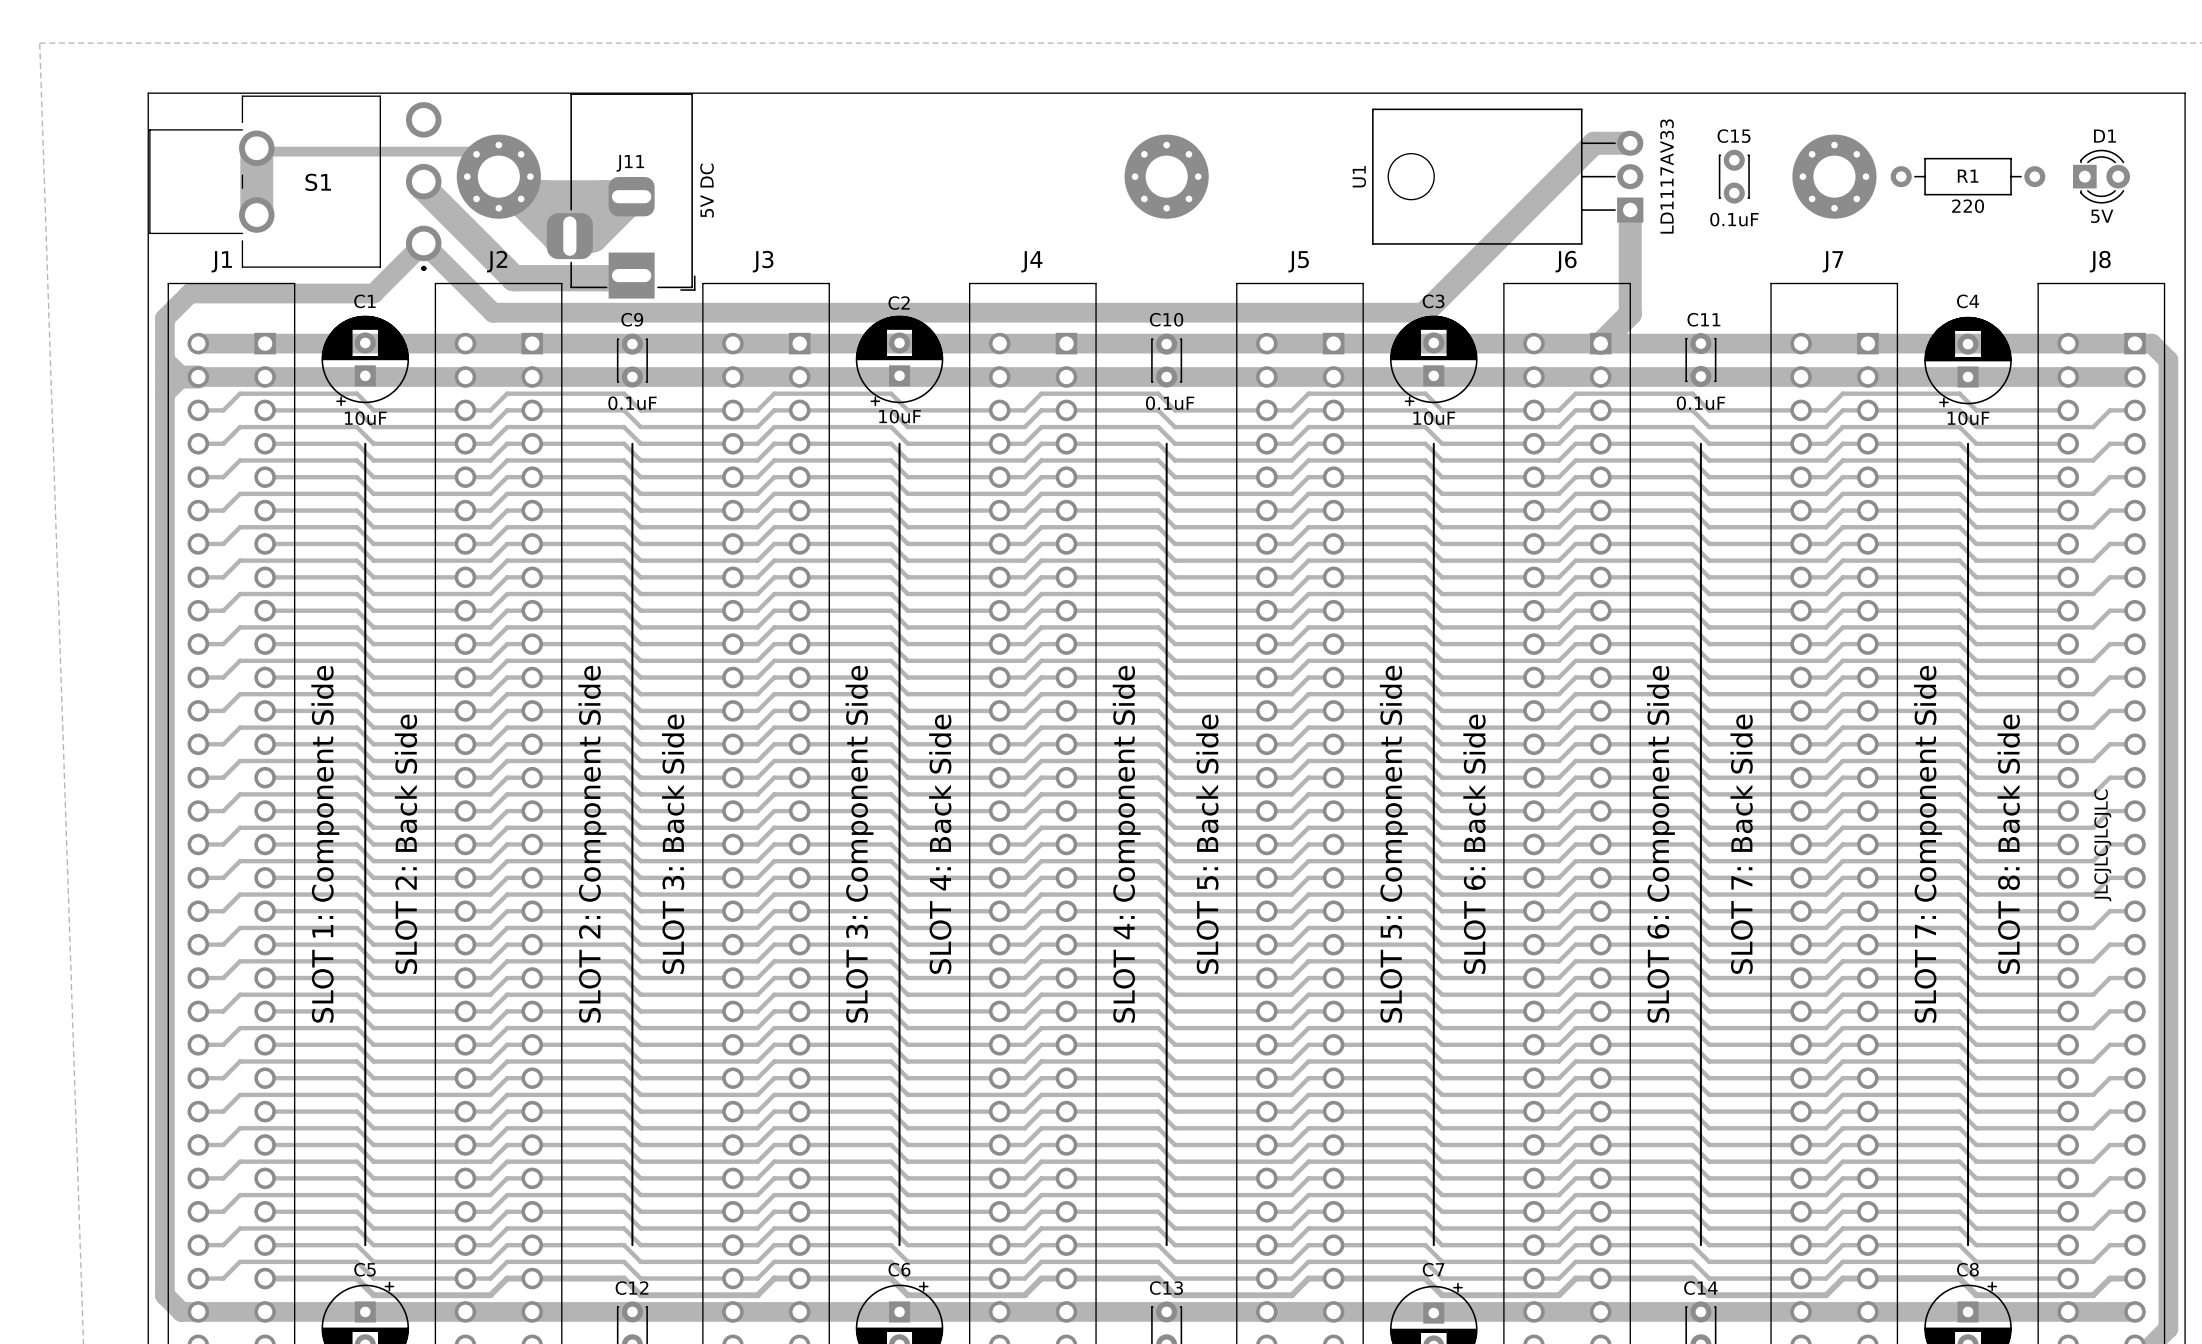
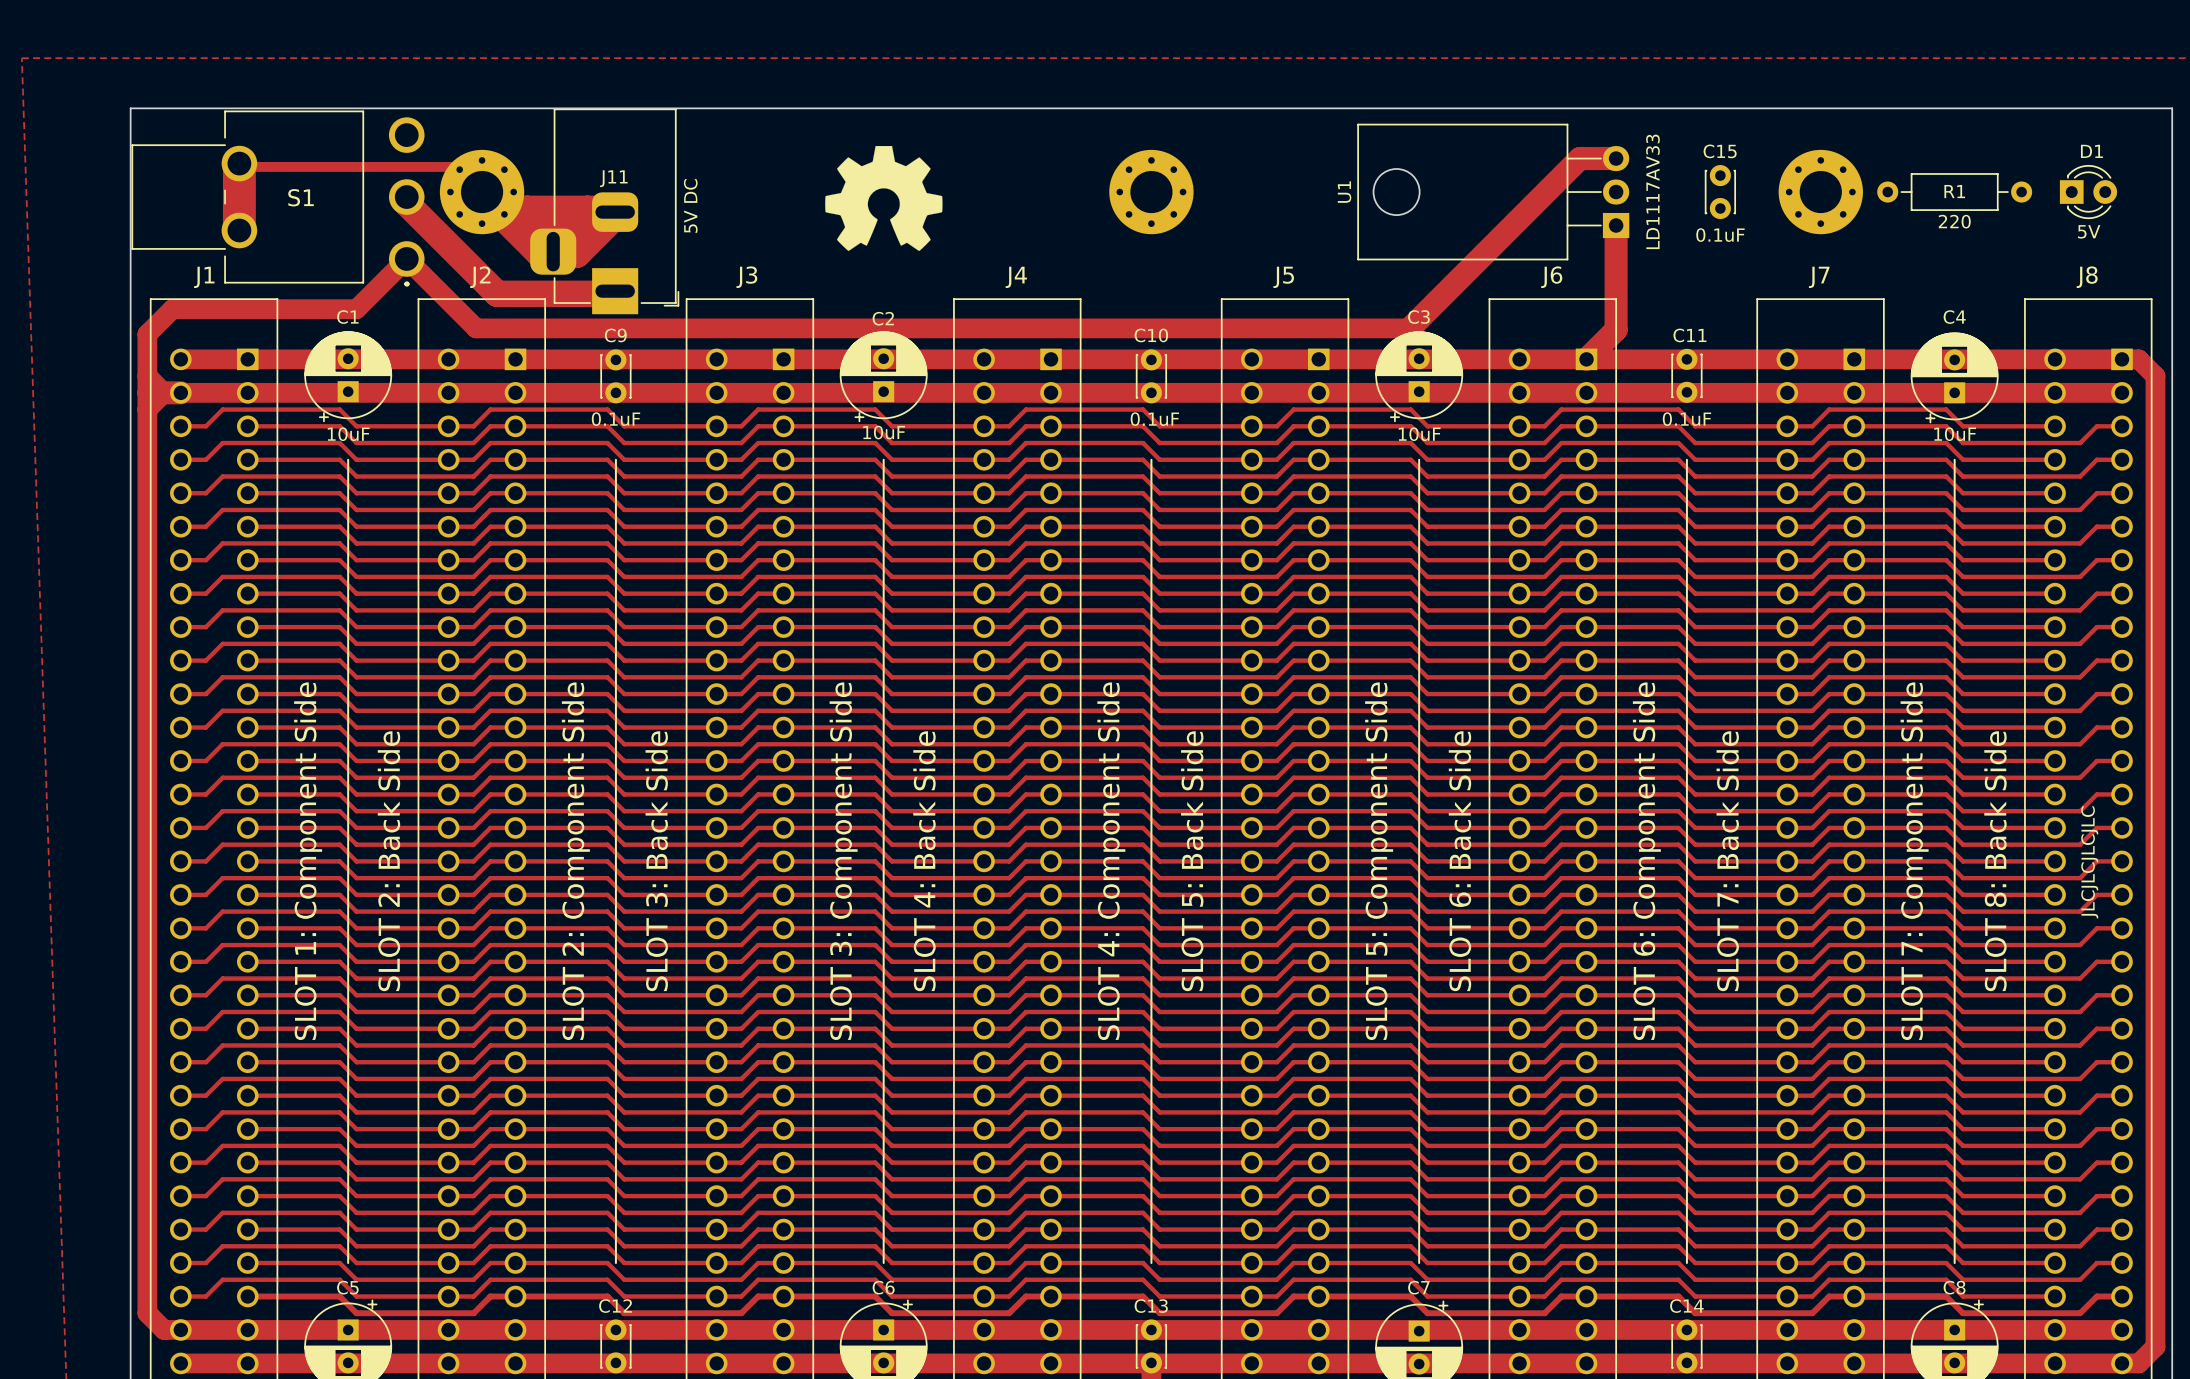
drawing: none -> [825, 145, 943, 251]

